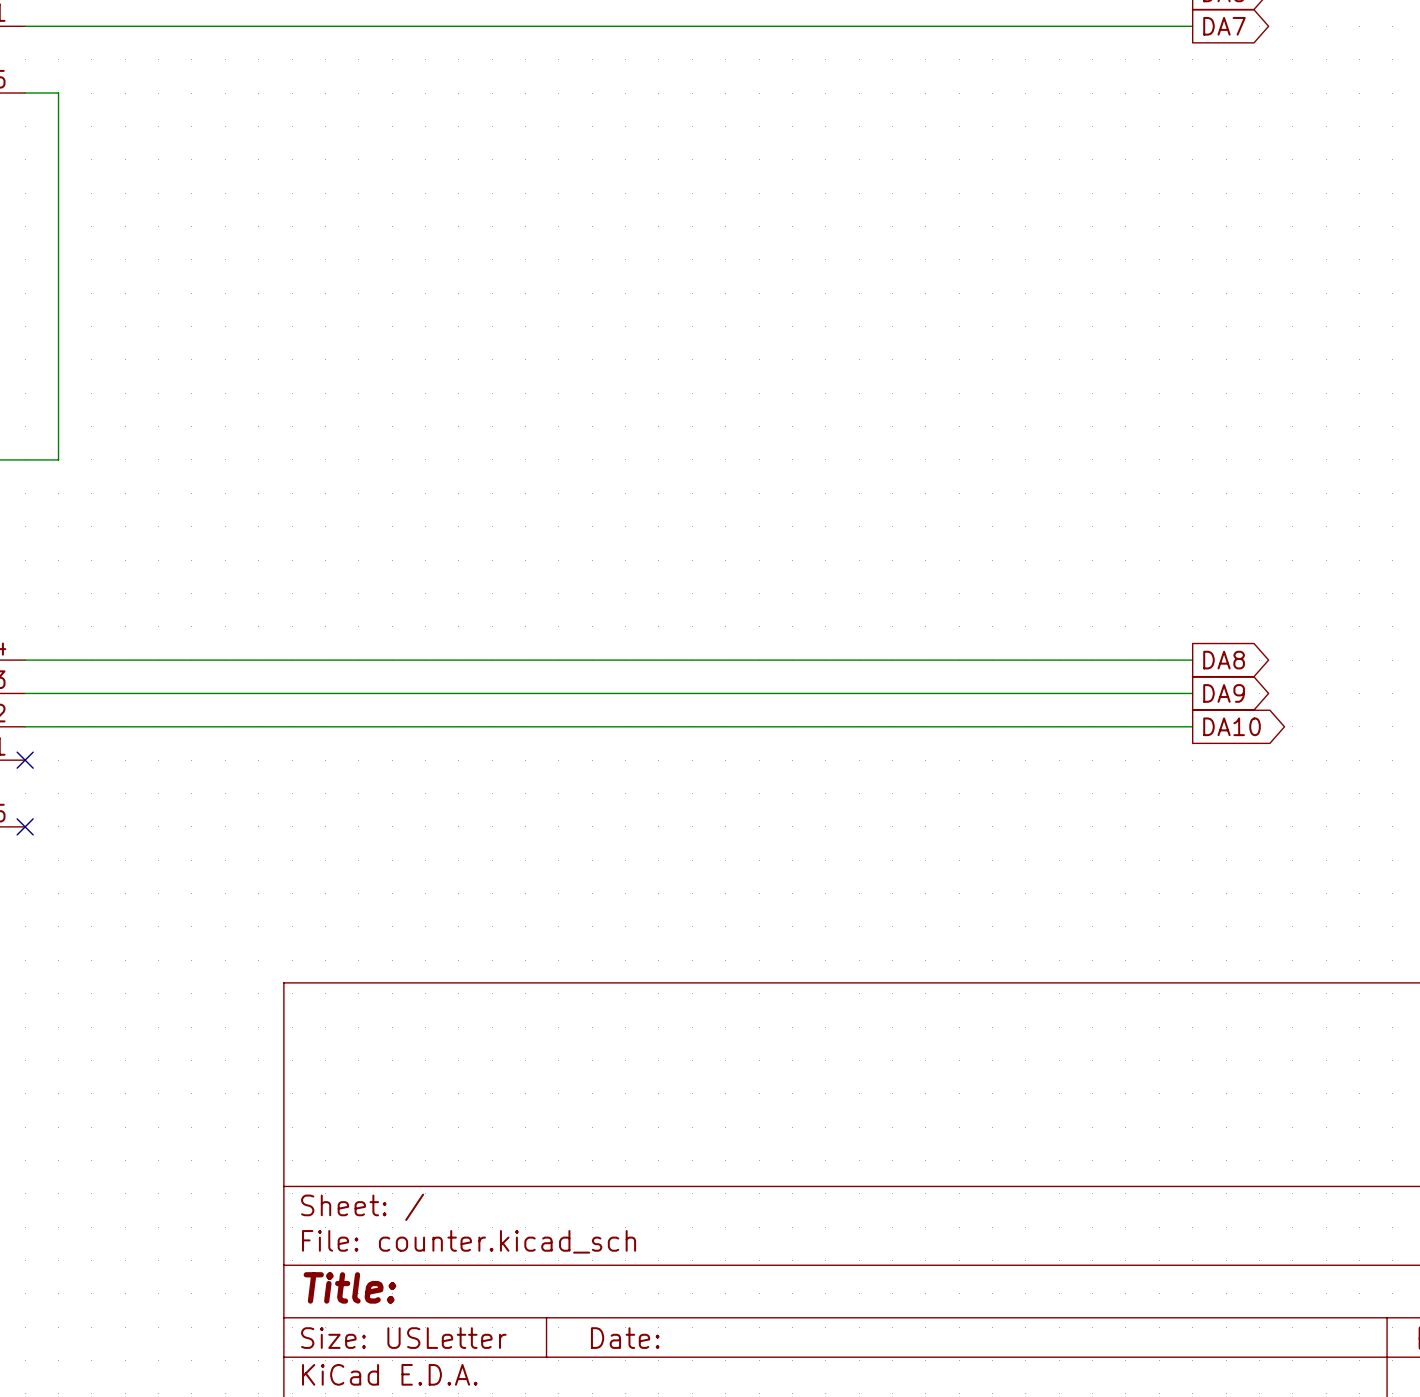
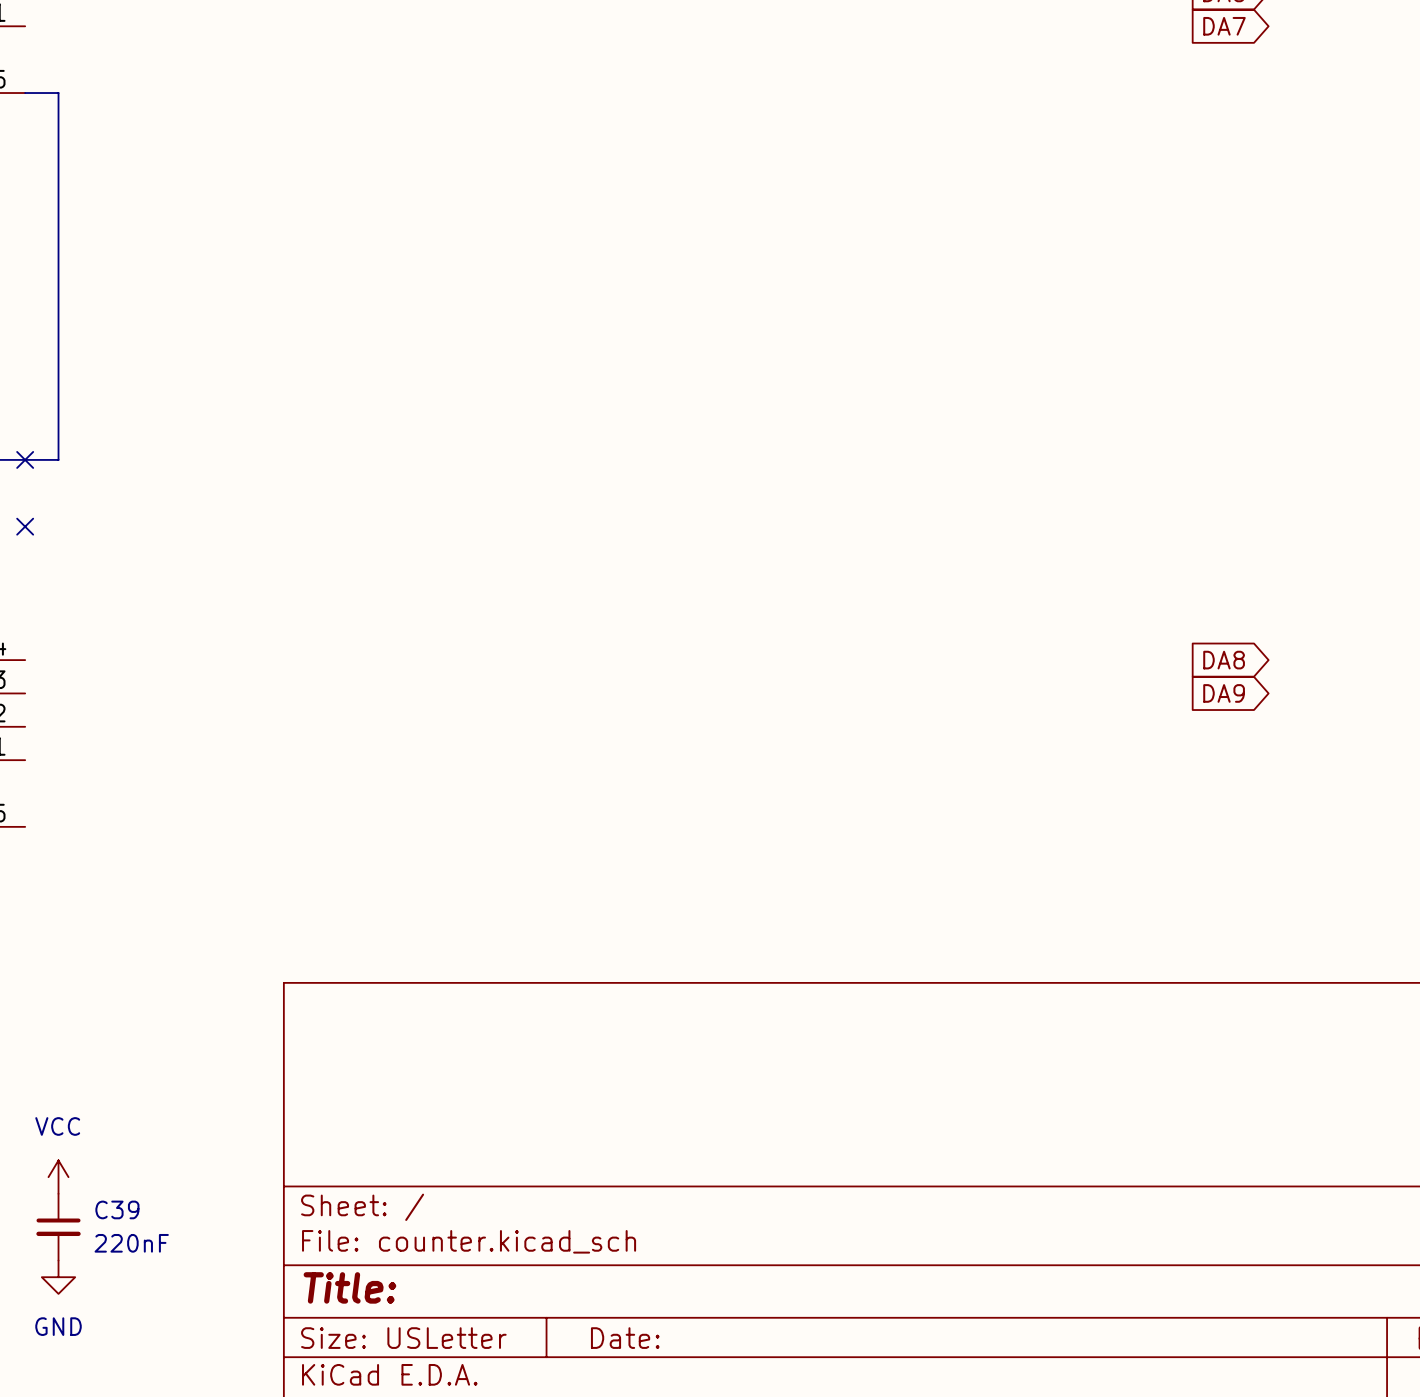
wire: (25, 26) (1192, 26) -> none
no-connect mark: none -> (25, 459)
no-connect mark: none -> (25, 526)
wire: (25, 660) (1192, 660) -> none
wire: (25, 693) (1192, 693) -> none
wire: (25, 726) (1192, 726) -> none
global label: DA10 (1232, 726) -> none
no-connect mark: (25, 760) -> none
no-connect mark: (25, 826) -> none
power symbol: none -> VCC (58, 1177)
C39: none -> 220nF (58, 1227)
power symbol: none -> GND (58, 1277)

